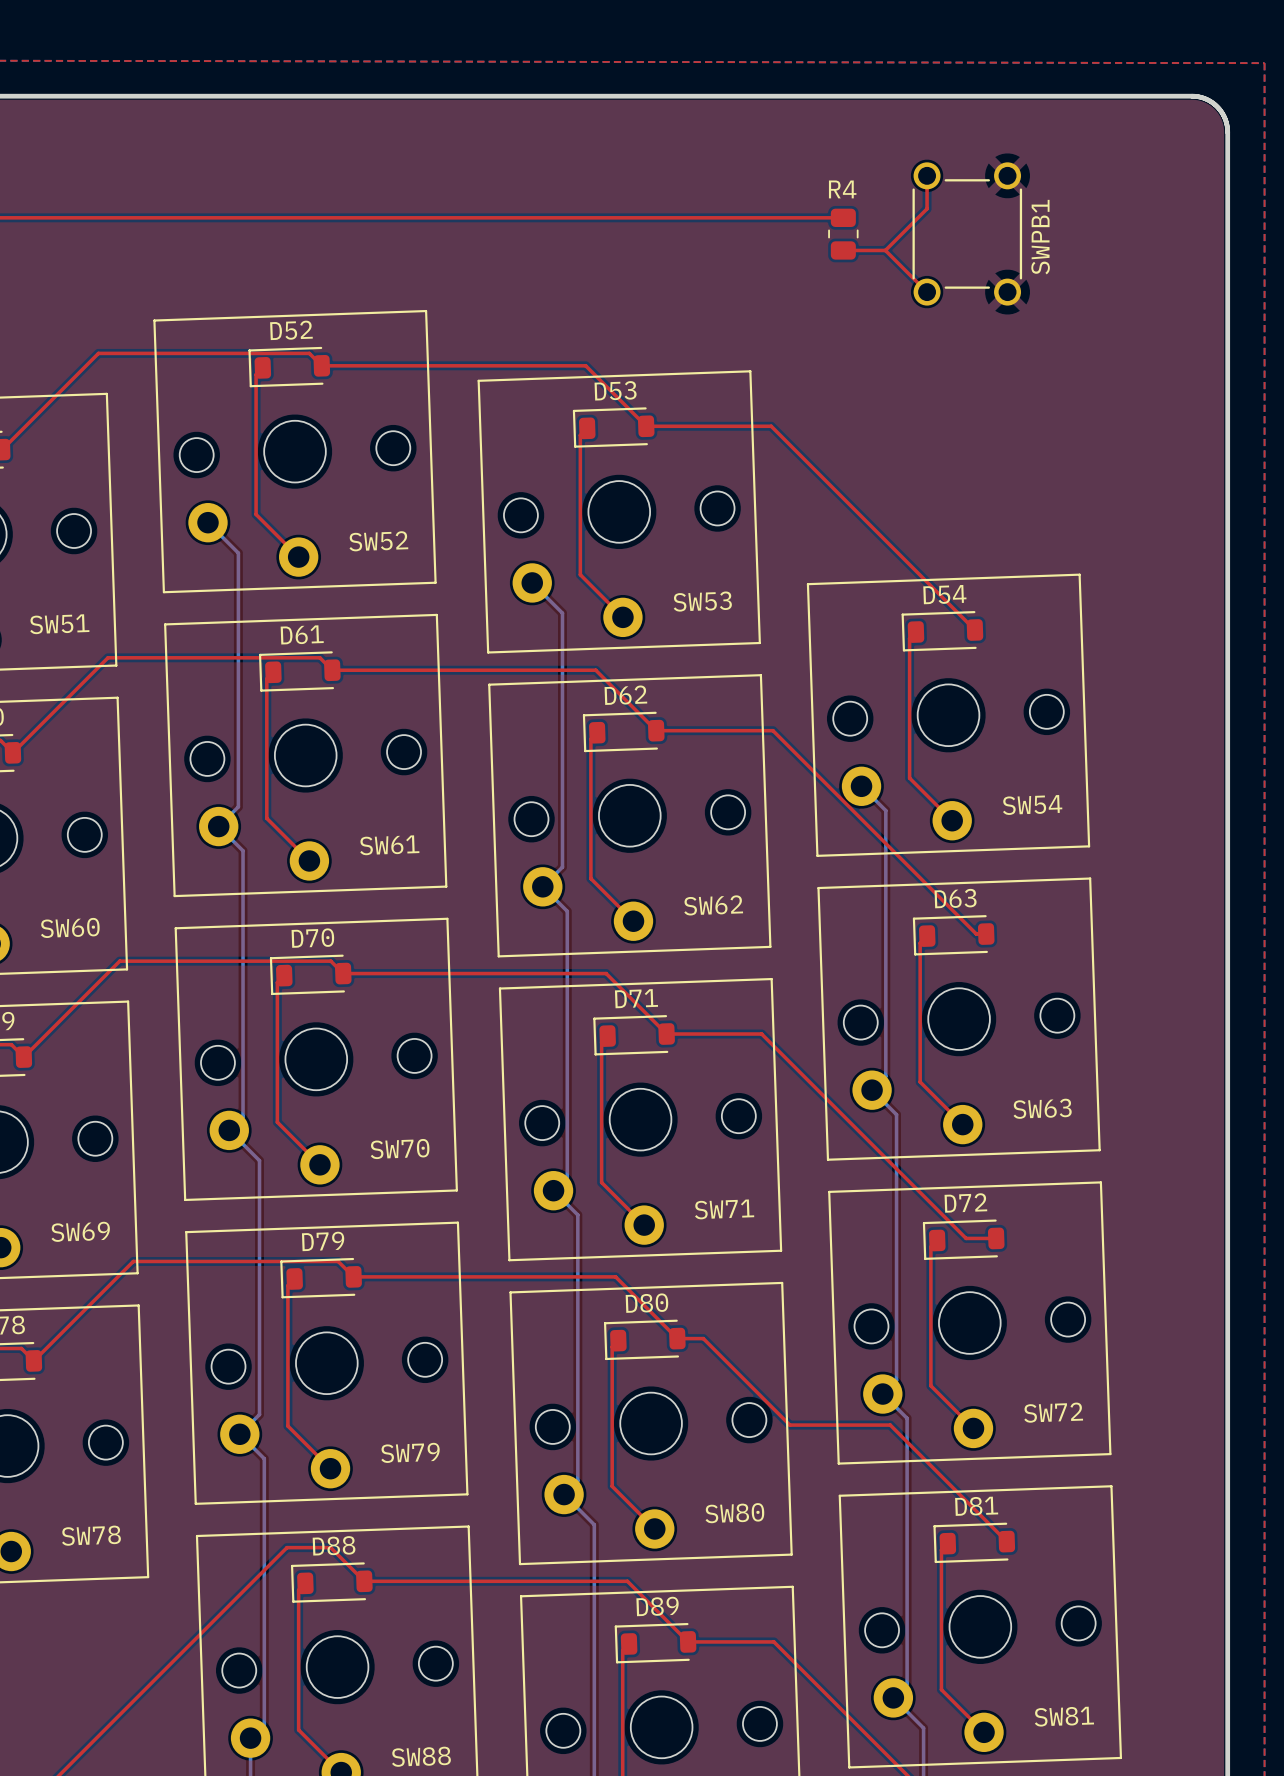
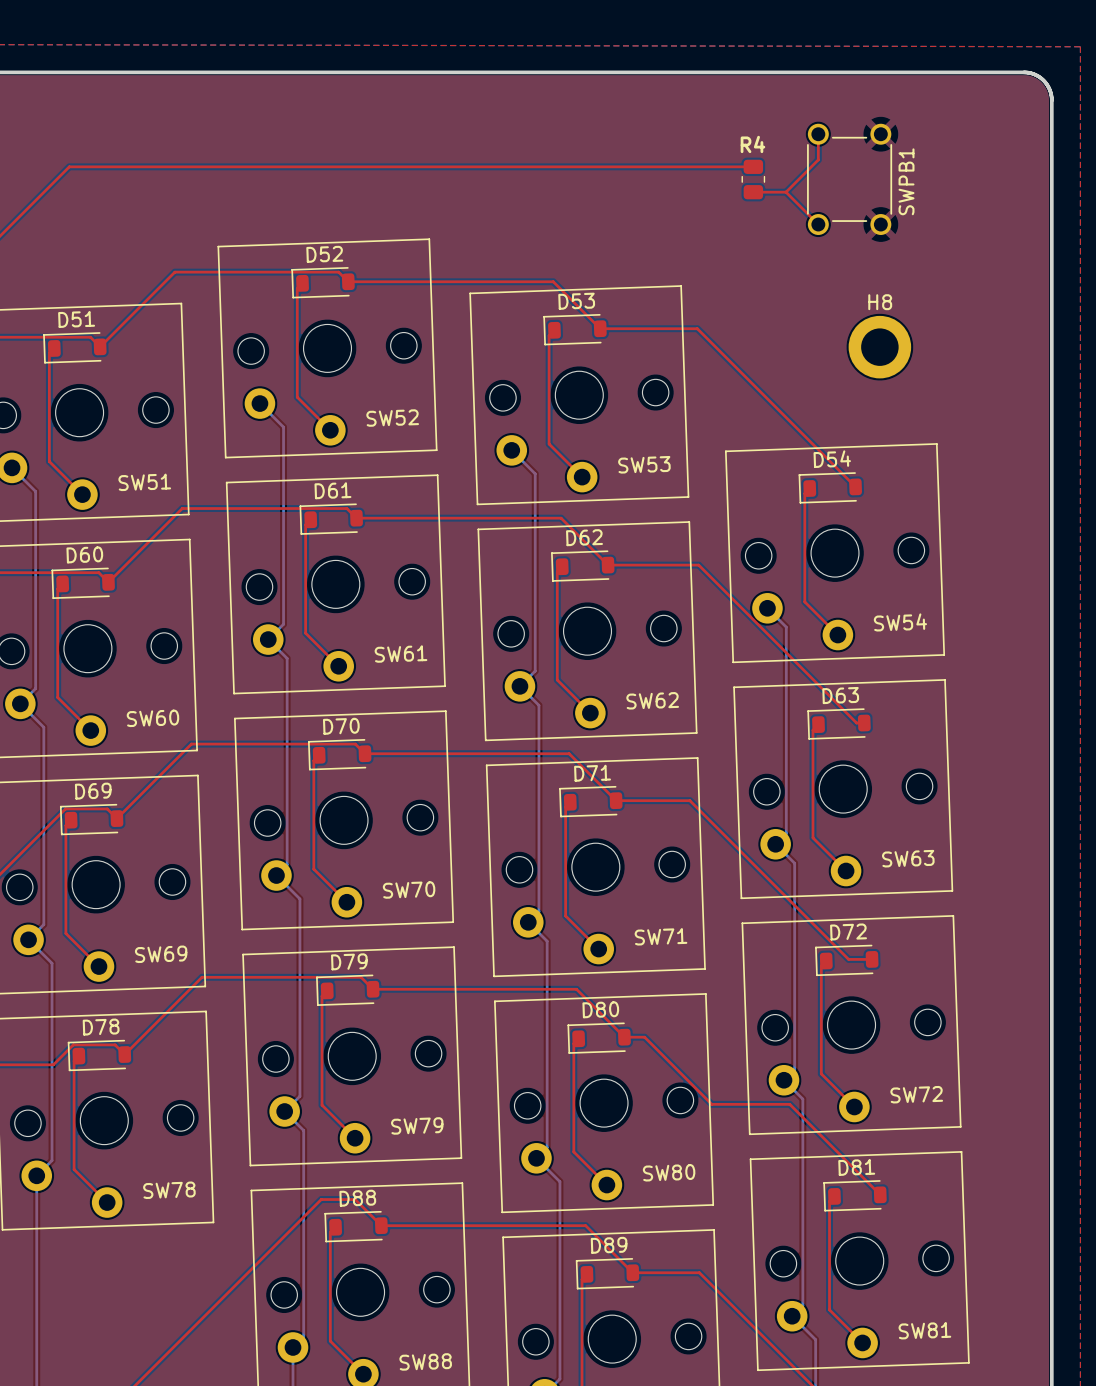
H8: none -> (879, 347)

